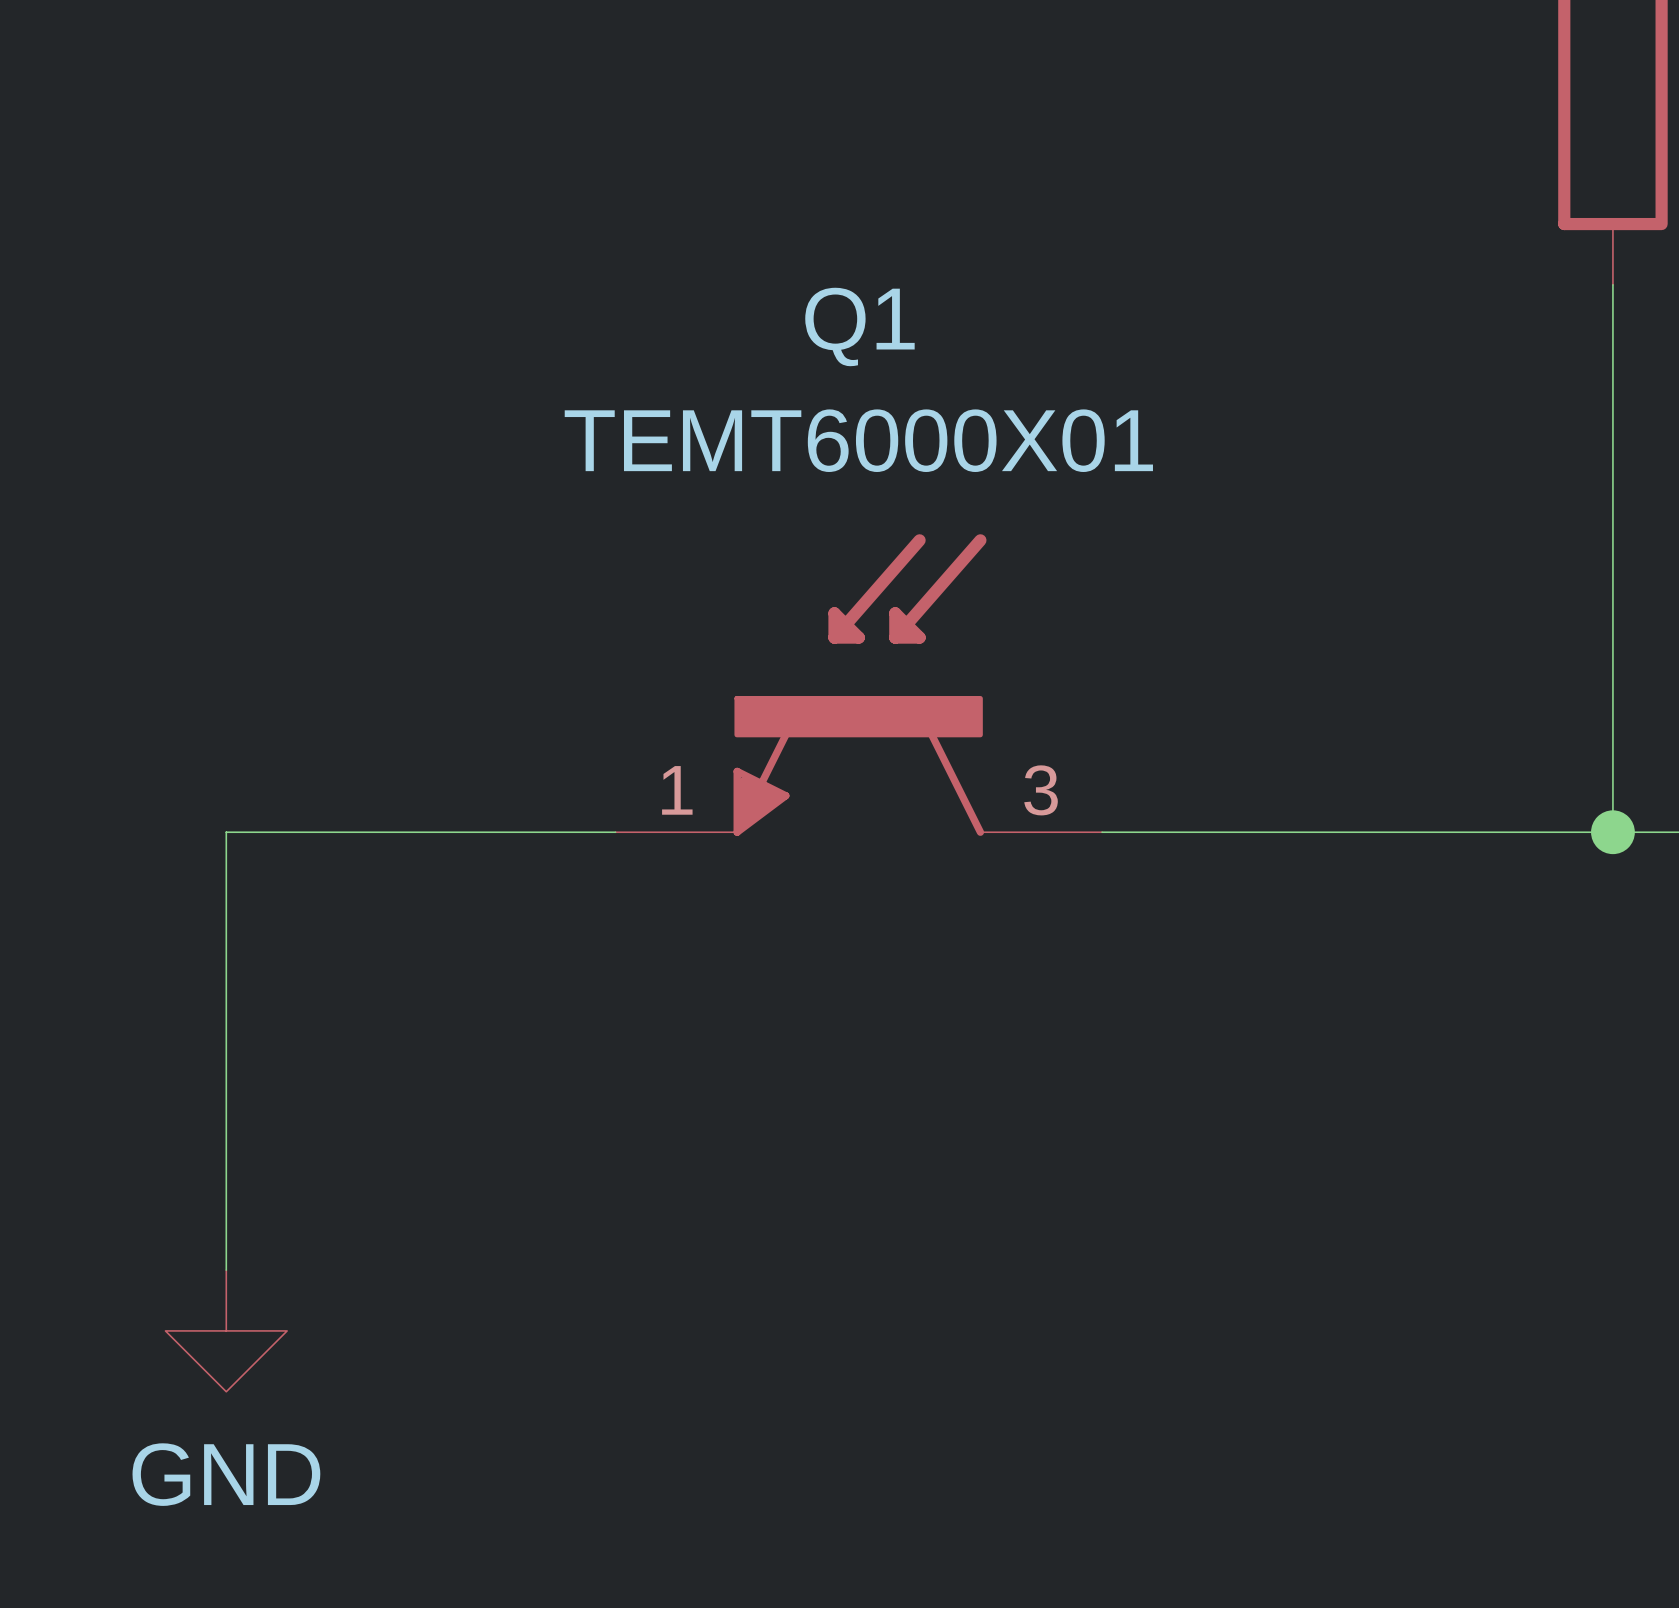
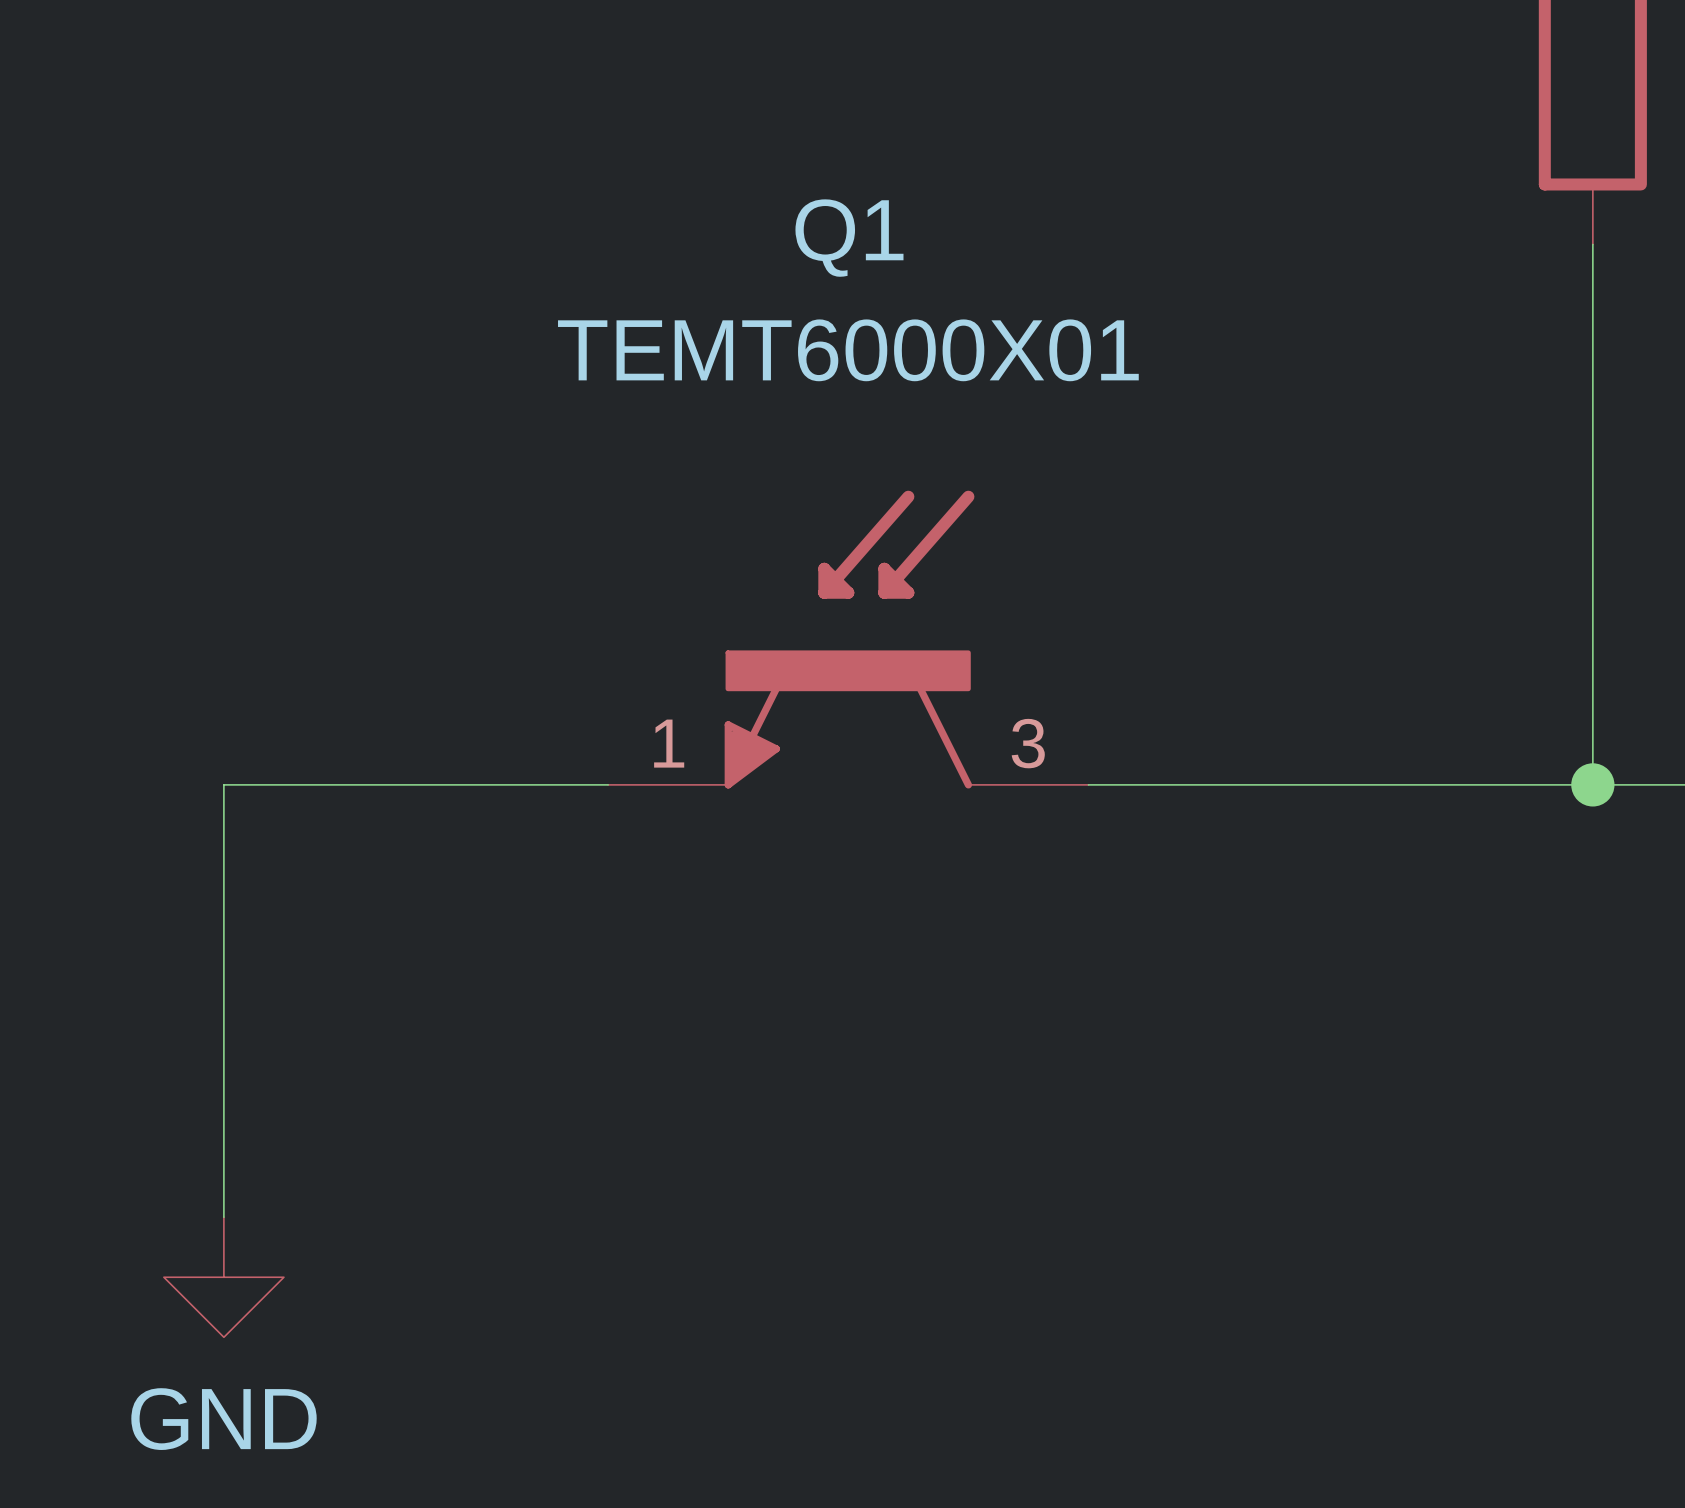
Q1 name position: Q1 (859, 326) -> Q1 (849, 238)
Q1 value position: TEMT6000X01 (858, 440) -> TEMT6000X01 (848, 350)

